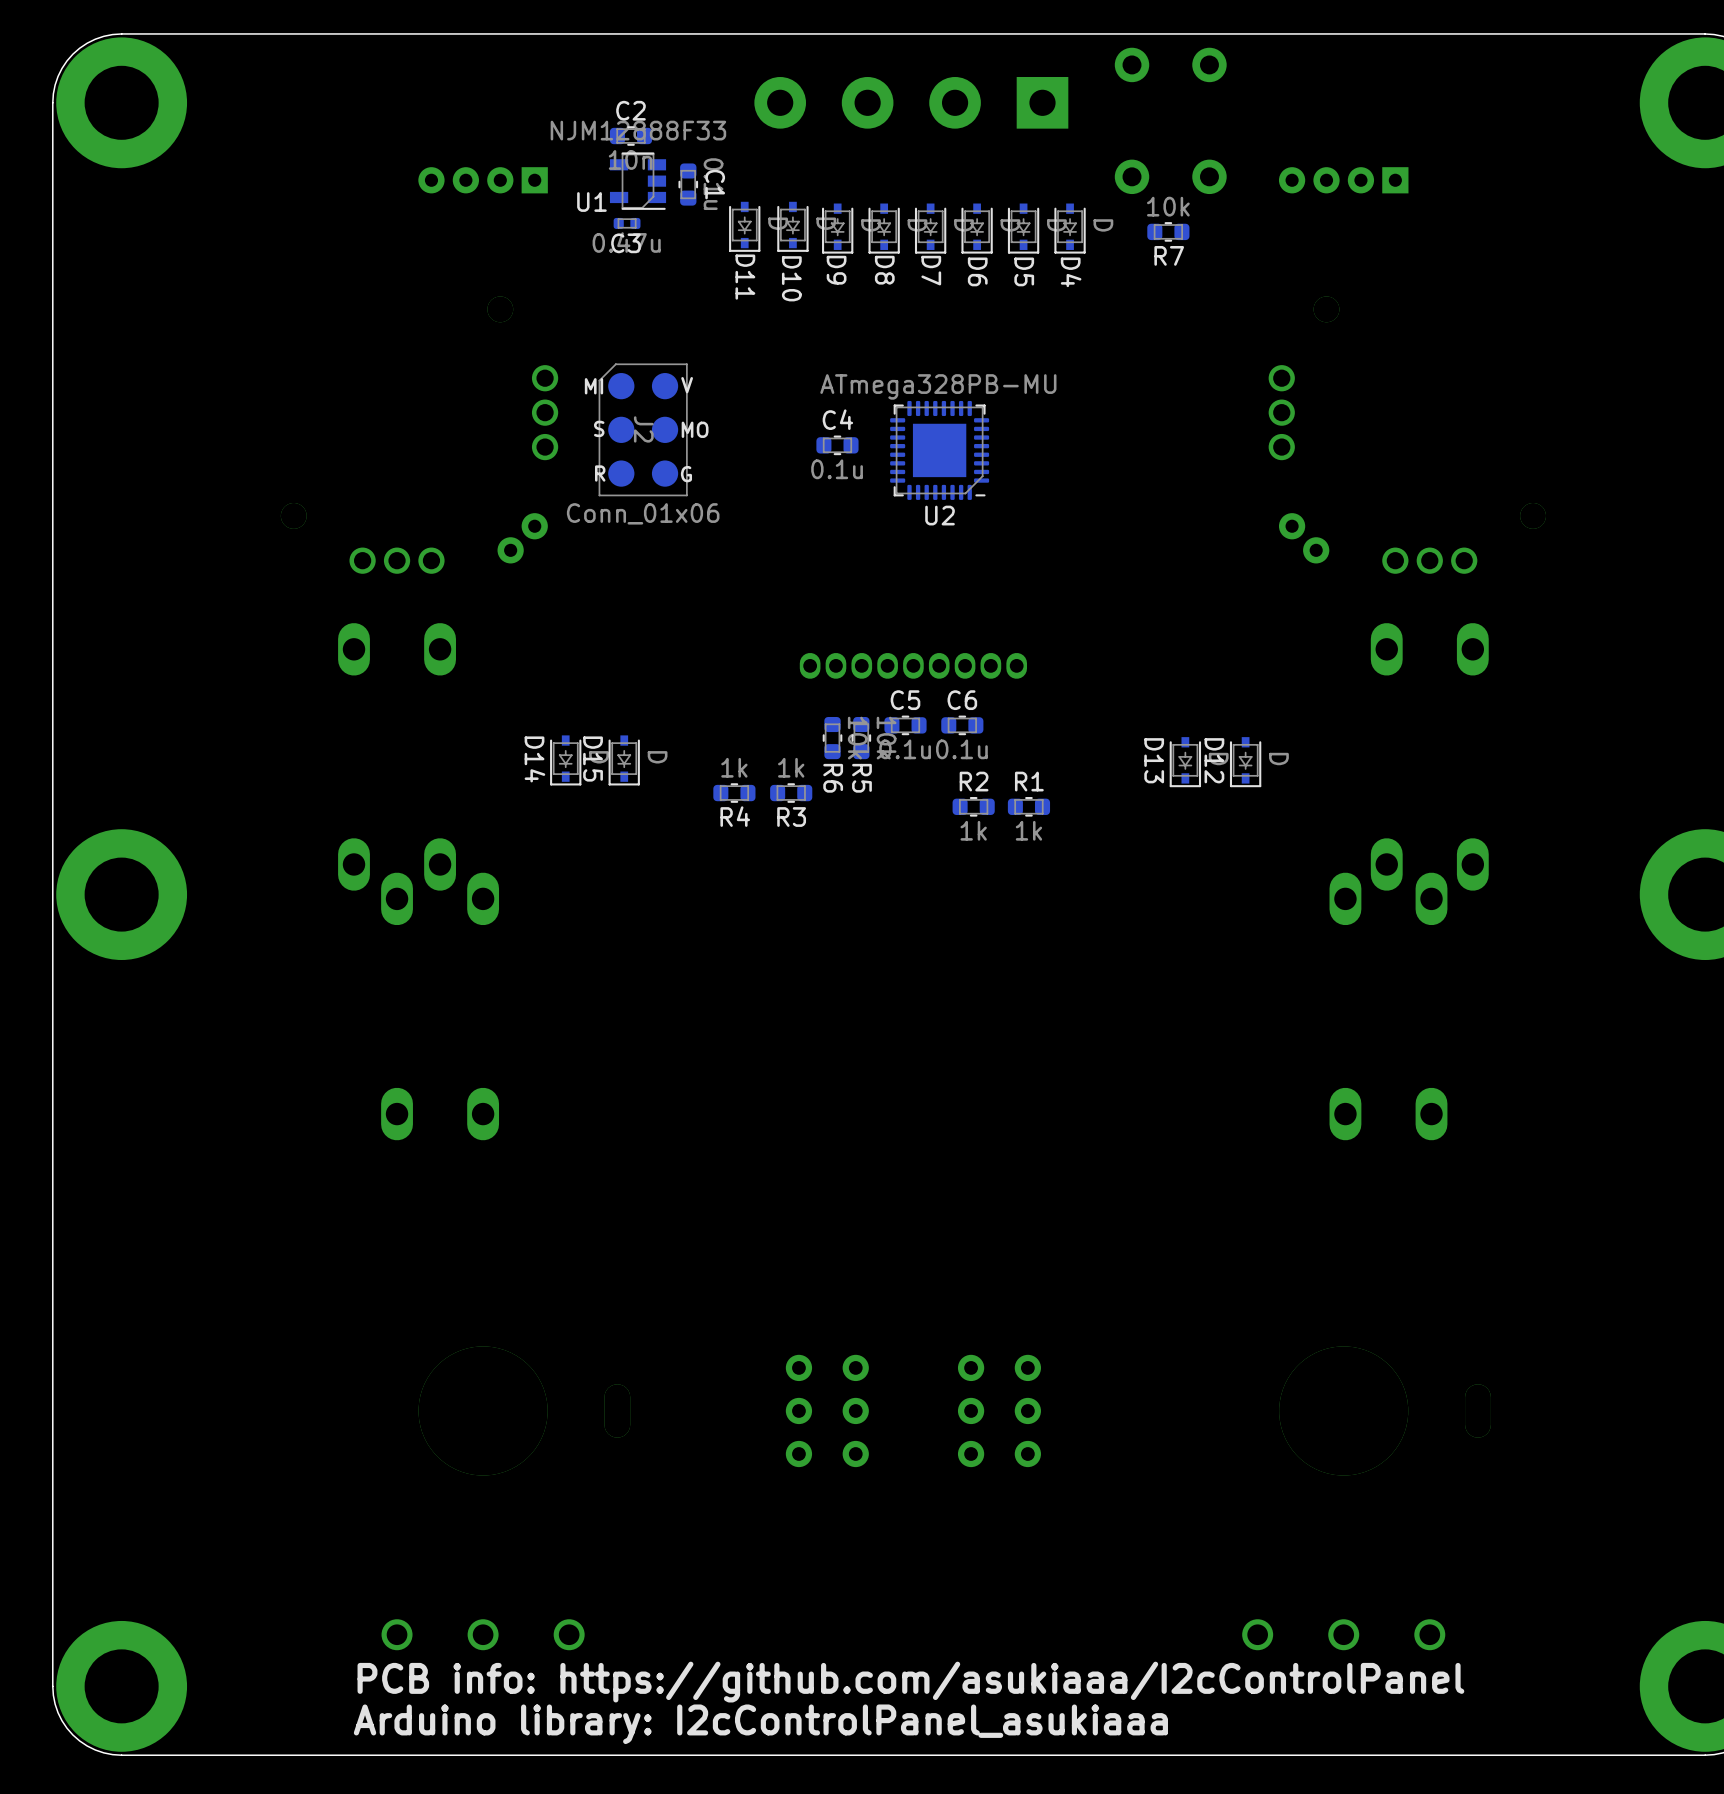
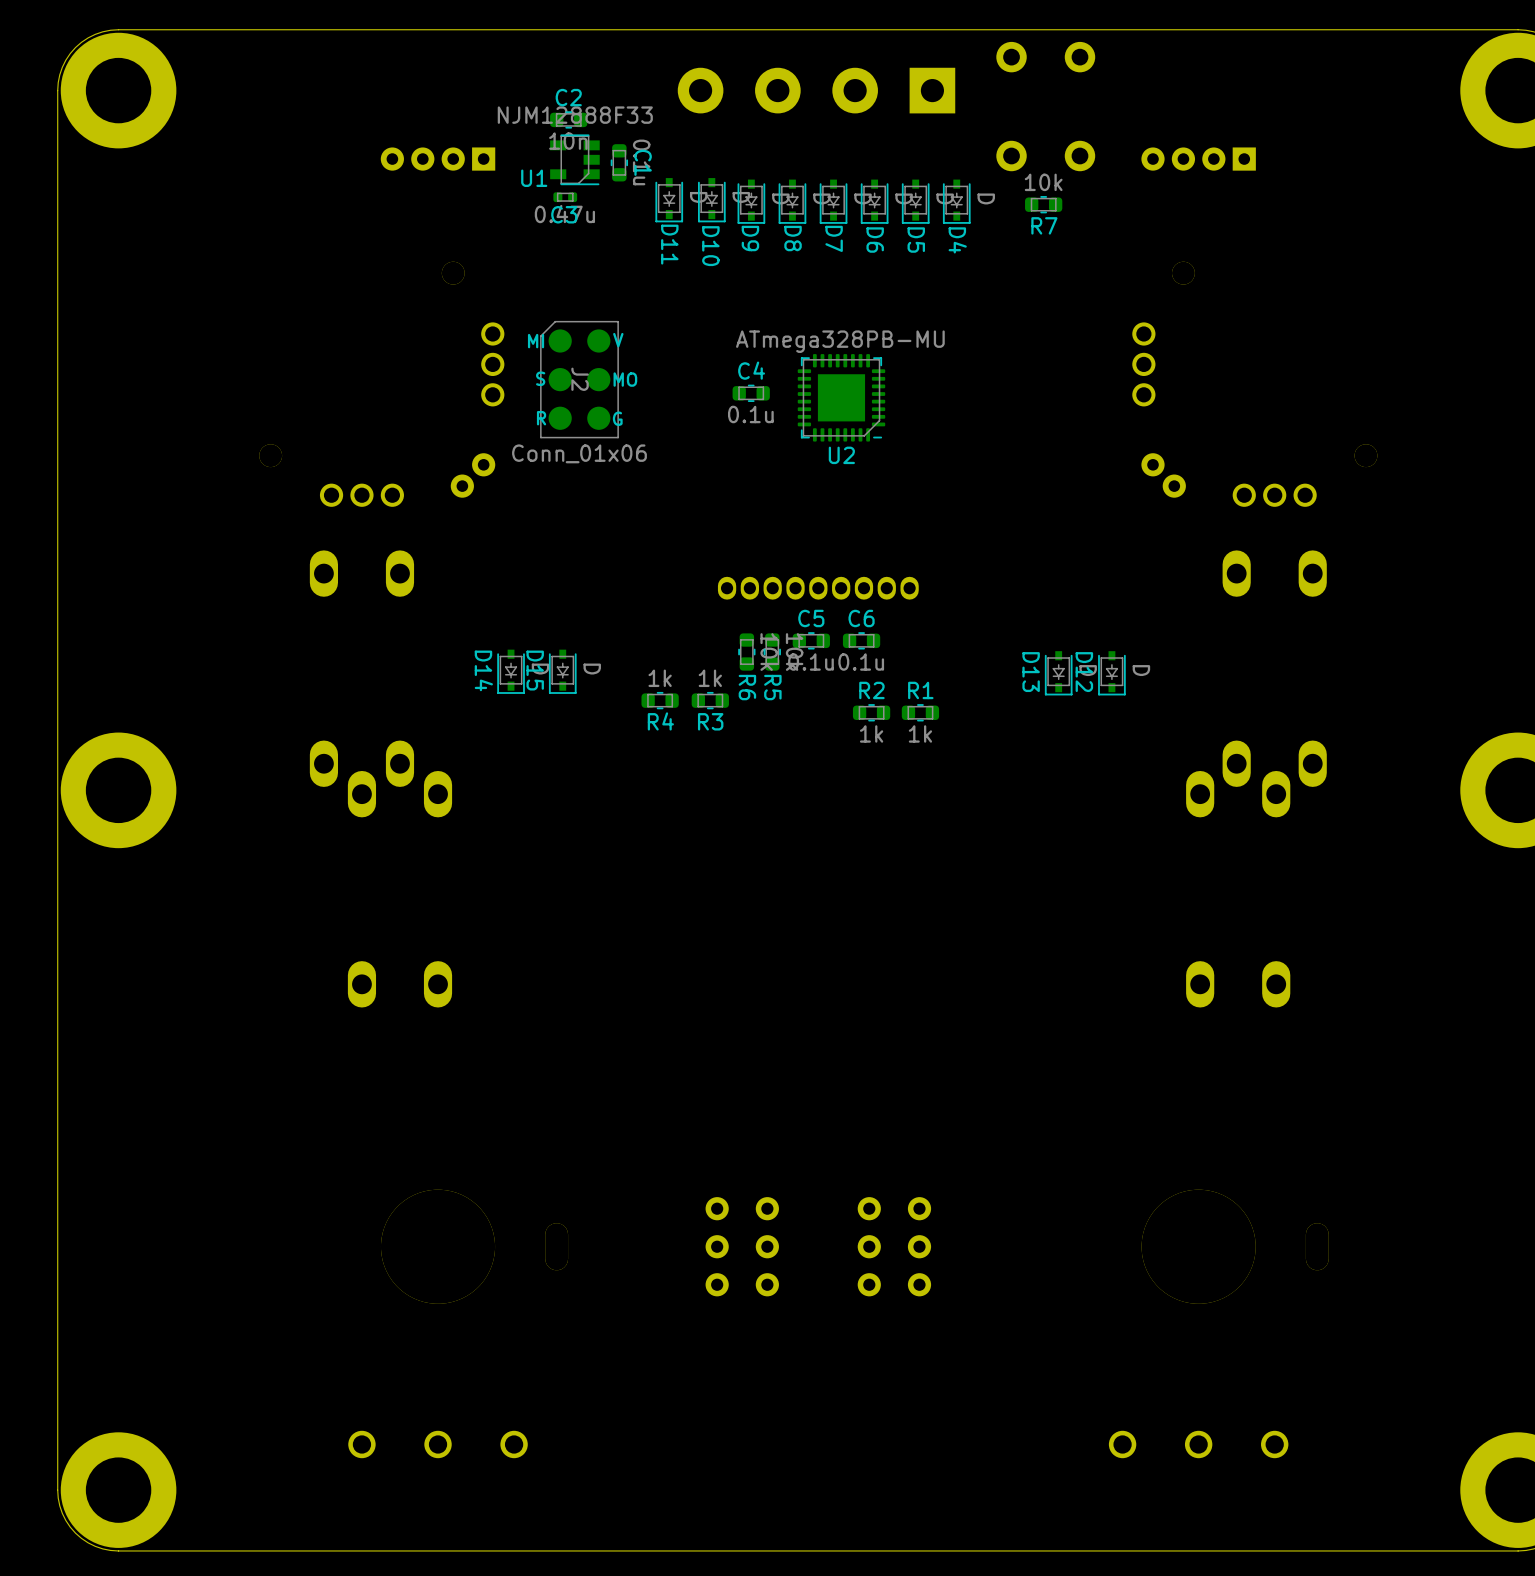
text: PCB info: https://github.com/asukiaaa/I2cControlPanel (910, 1682) -> none
text: Arduino library: I2cControlPanel_asukiaaa (760, 1724) -> none

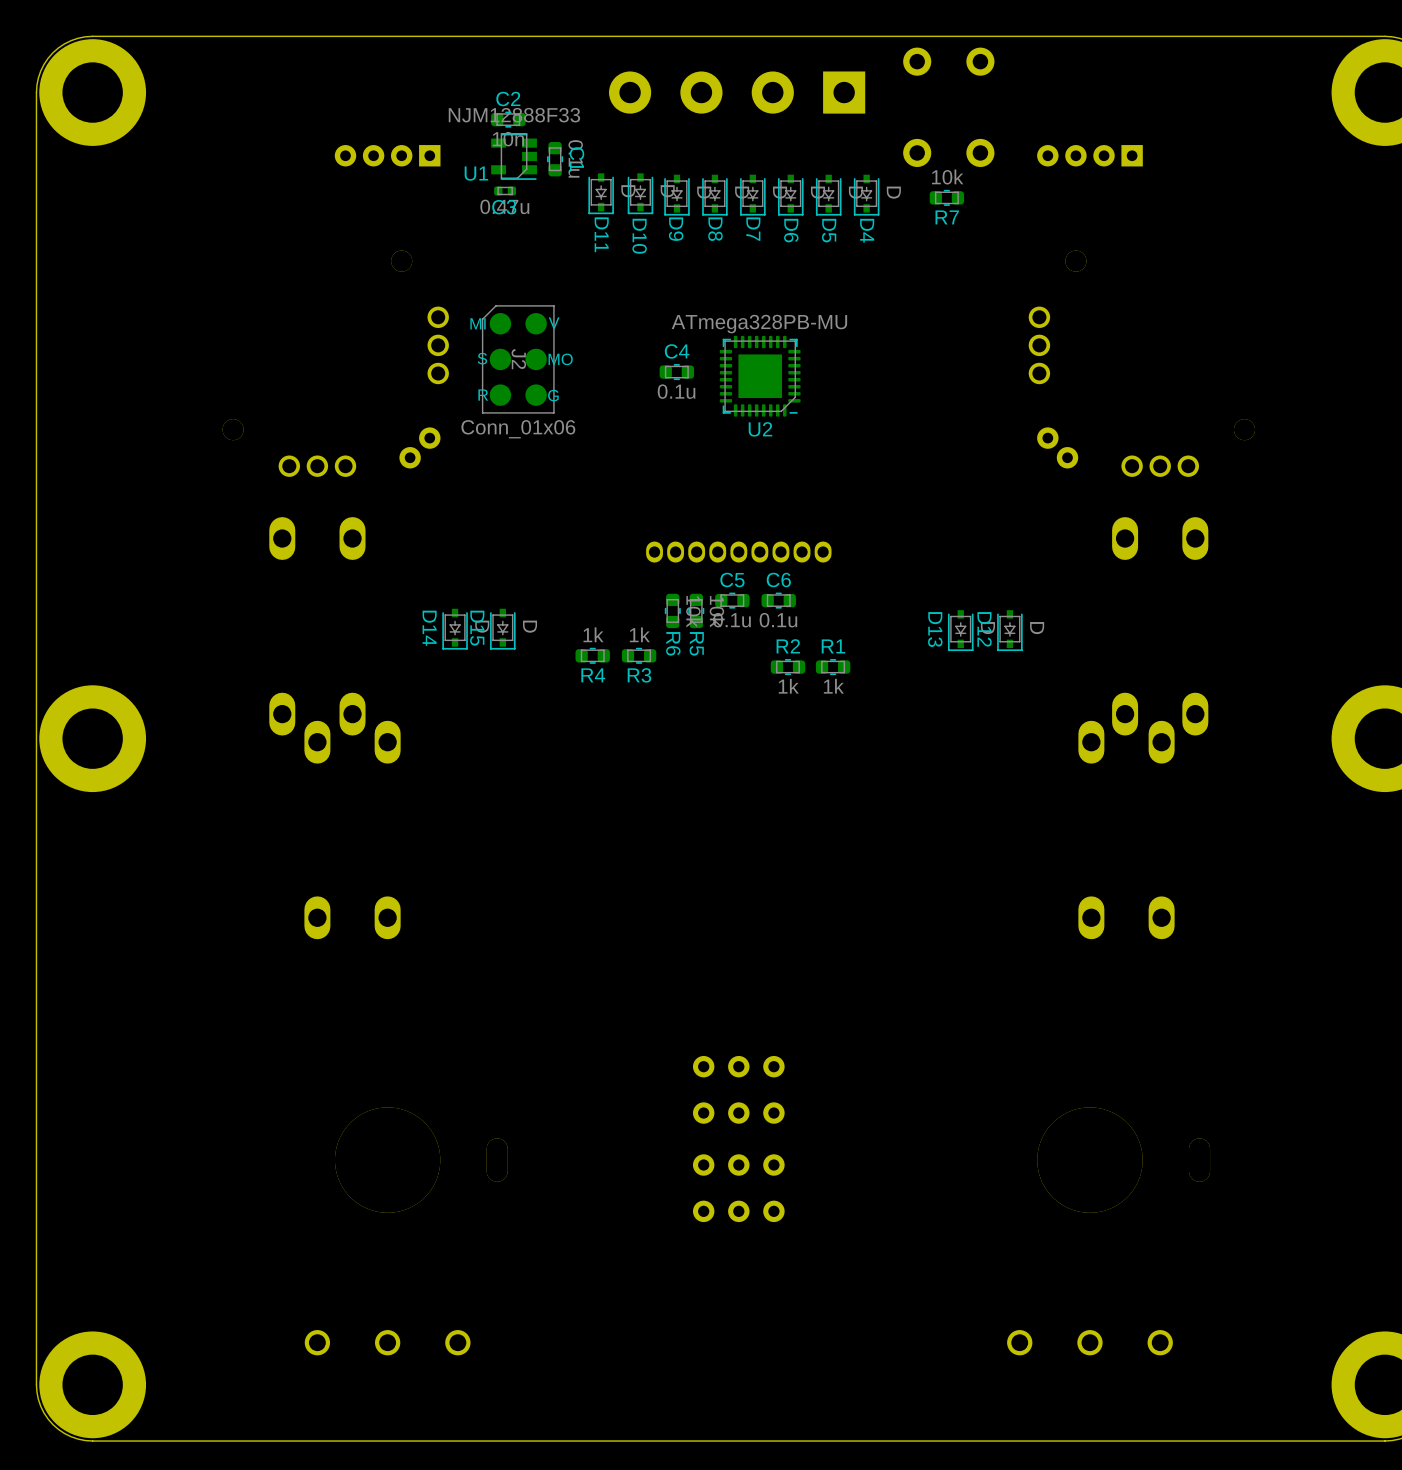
part: none -> (738, 1089)
part: (742, 1246) -> none
part: (894, 1246) -> none
part: none -> (738, 1188)

